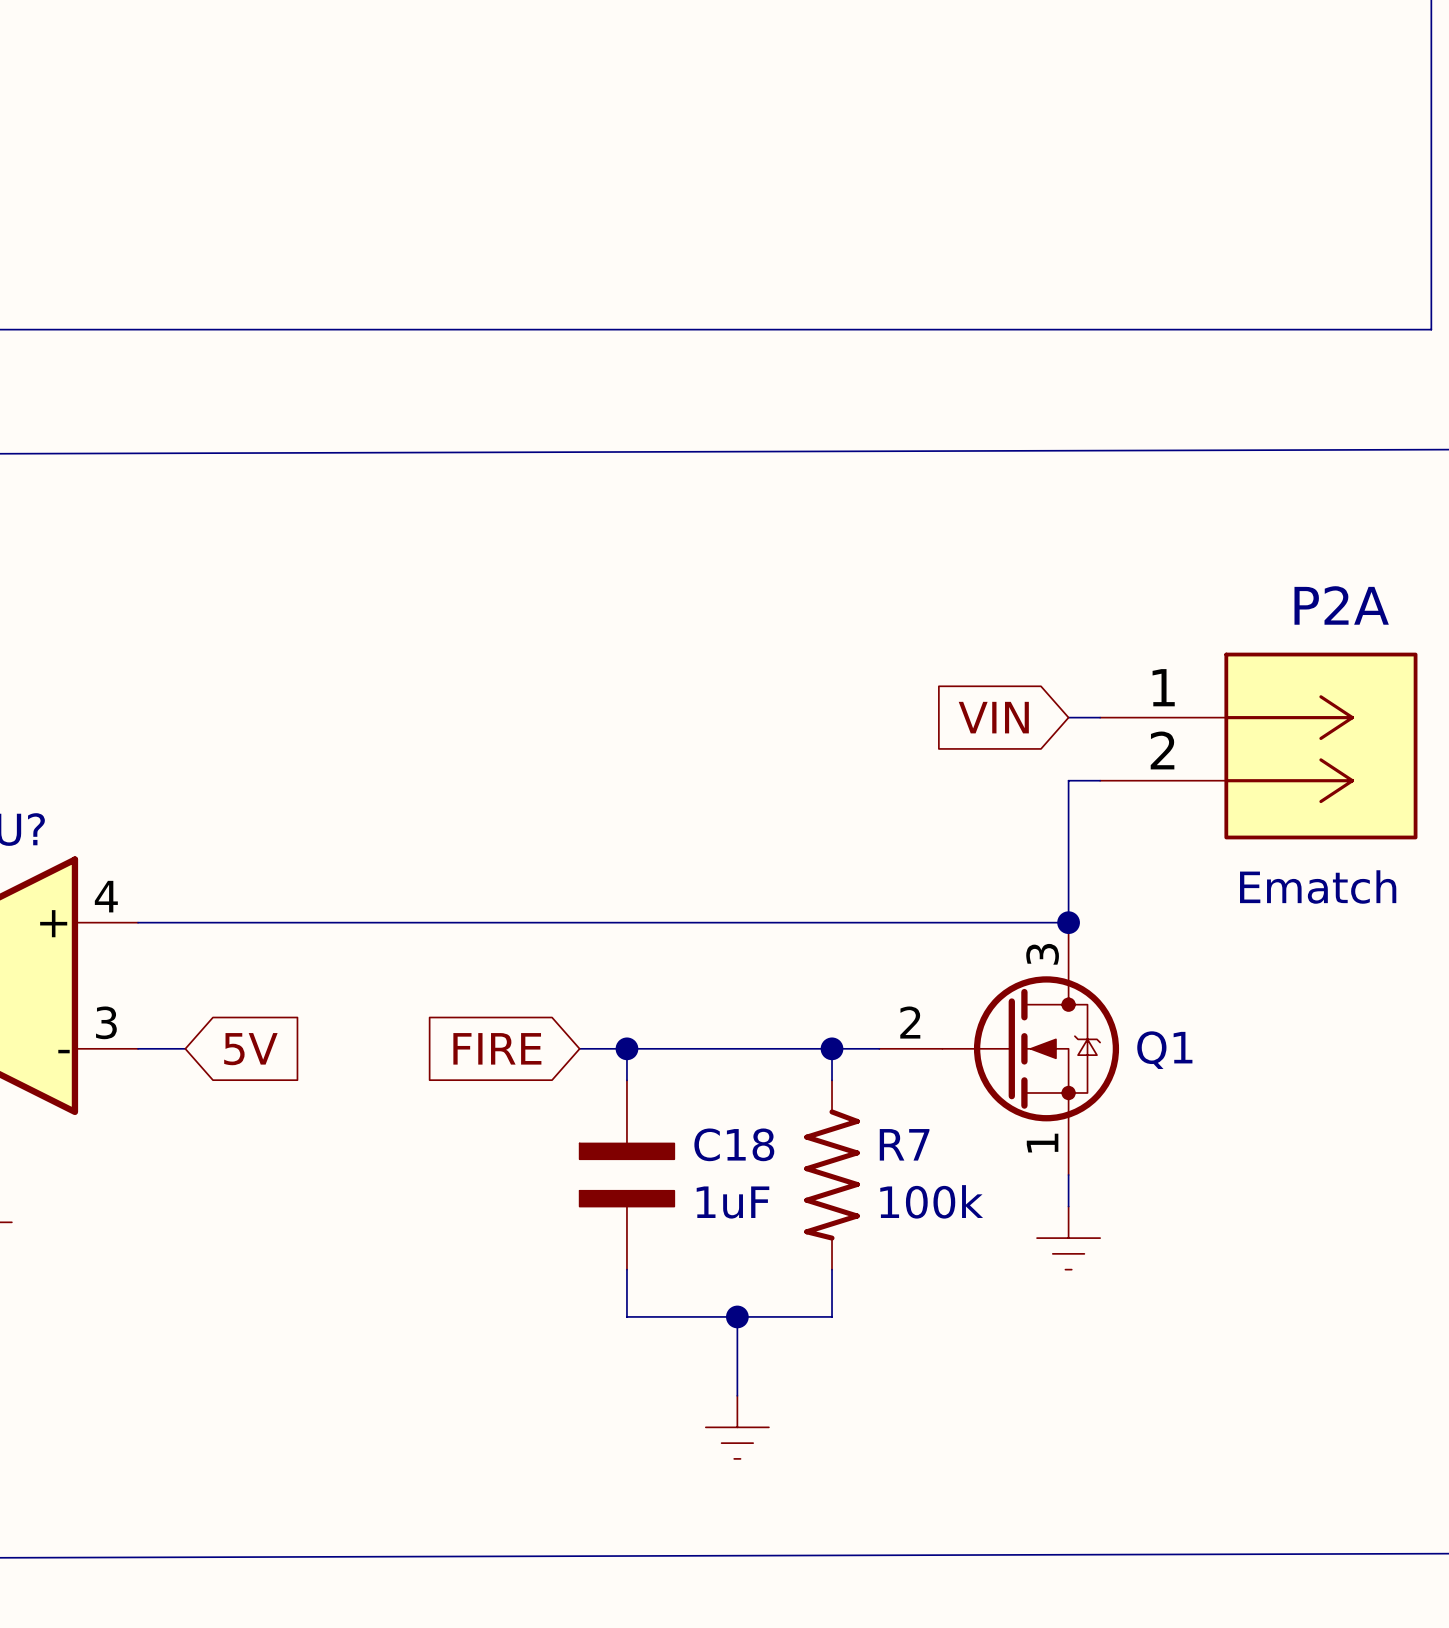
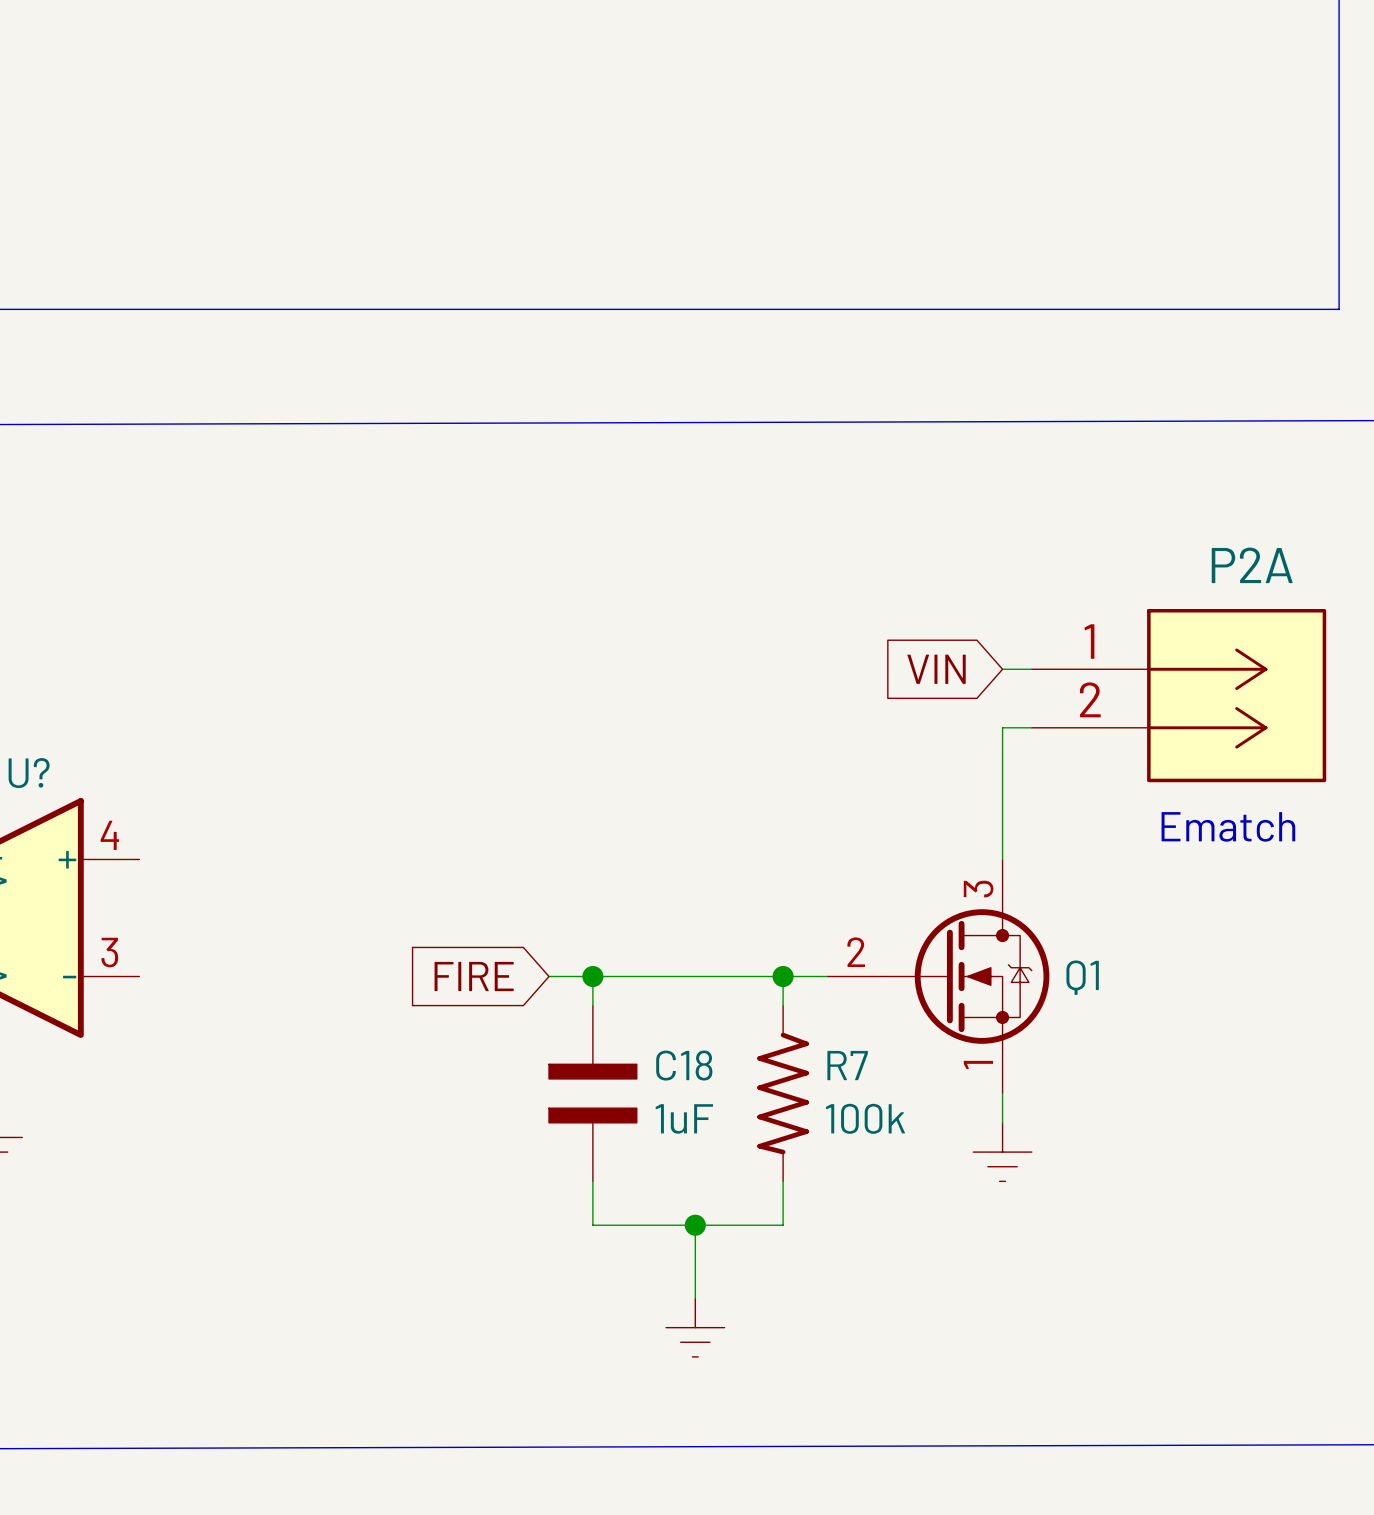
wire: (138, 922) (1068, 922) -> none
junction: (1068, 922) -> none
wire: (138, 1048) (185, 1048) -> none
global label: 5V (250, 1049) -> none

